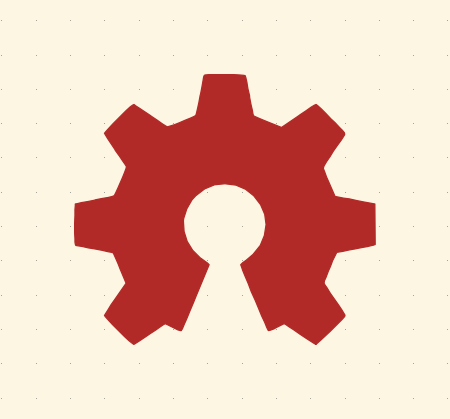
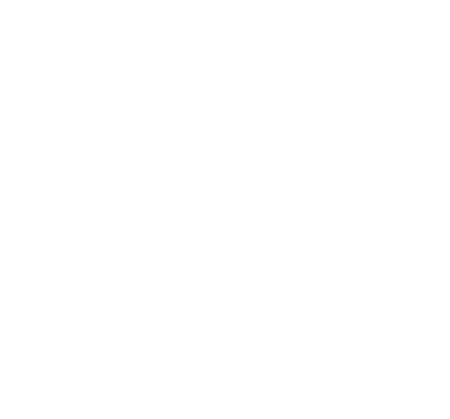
part: (224, 209) -> none

